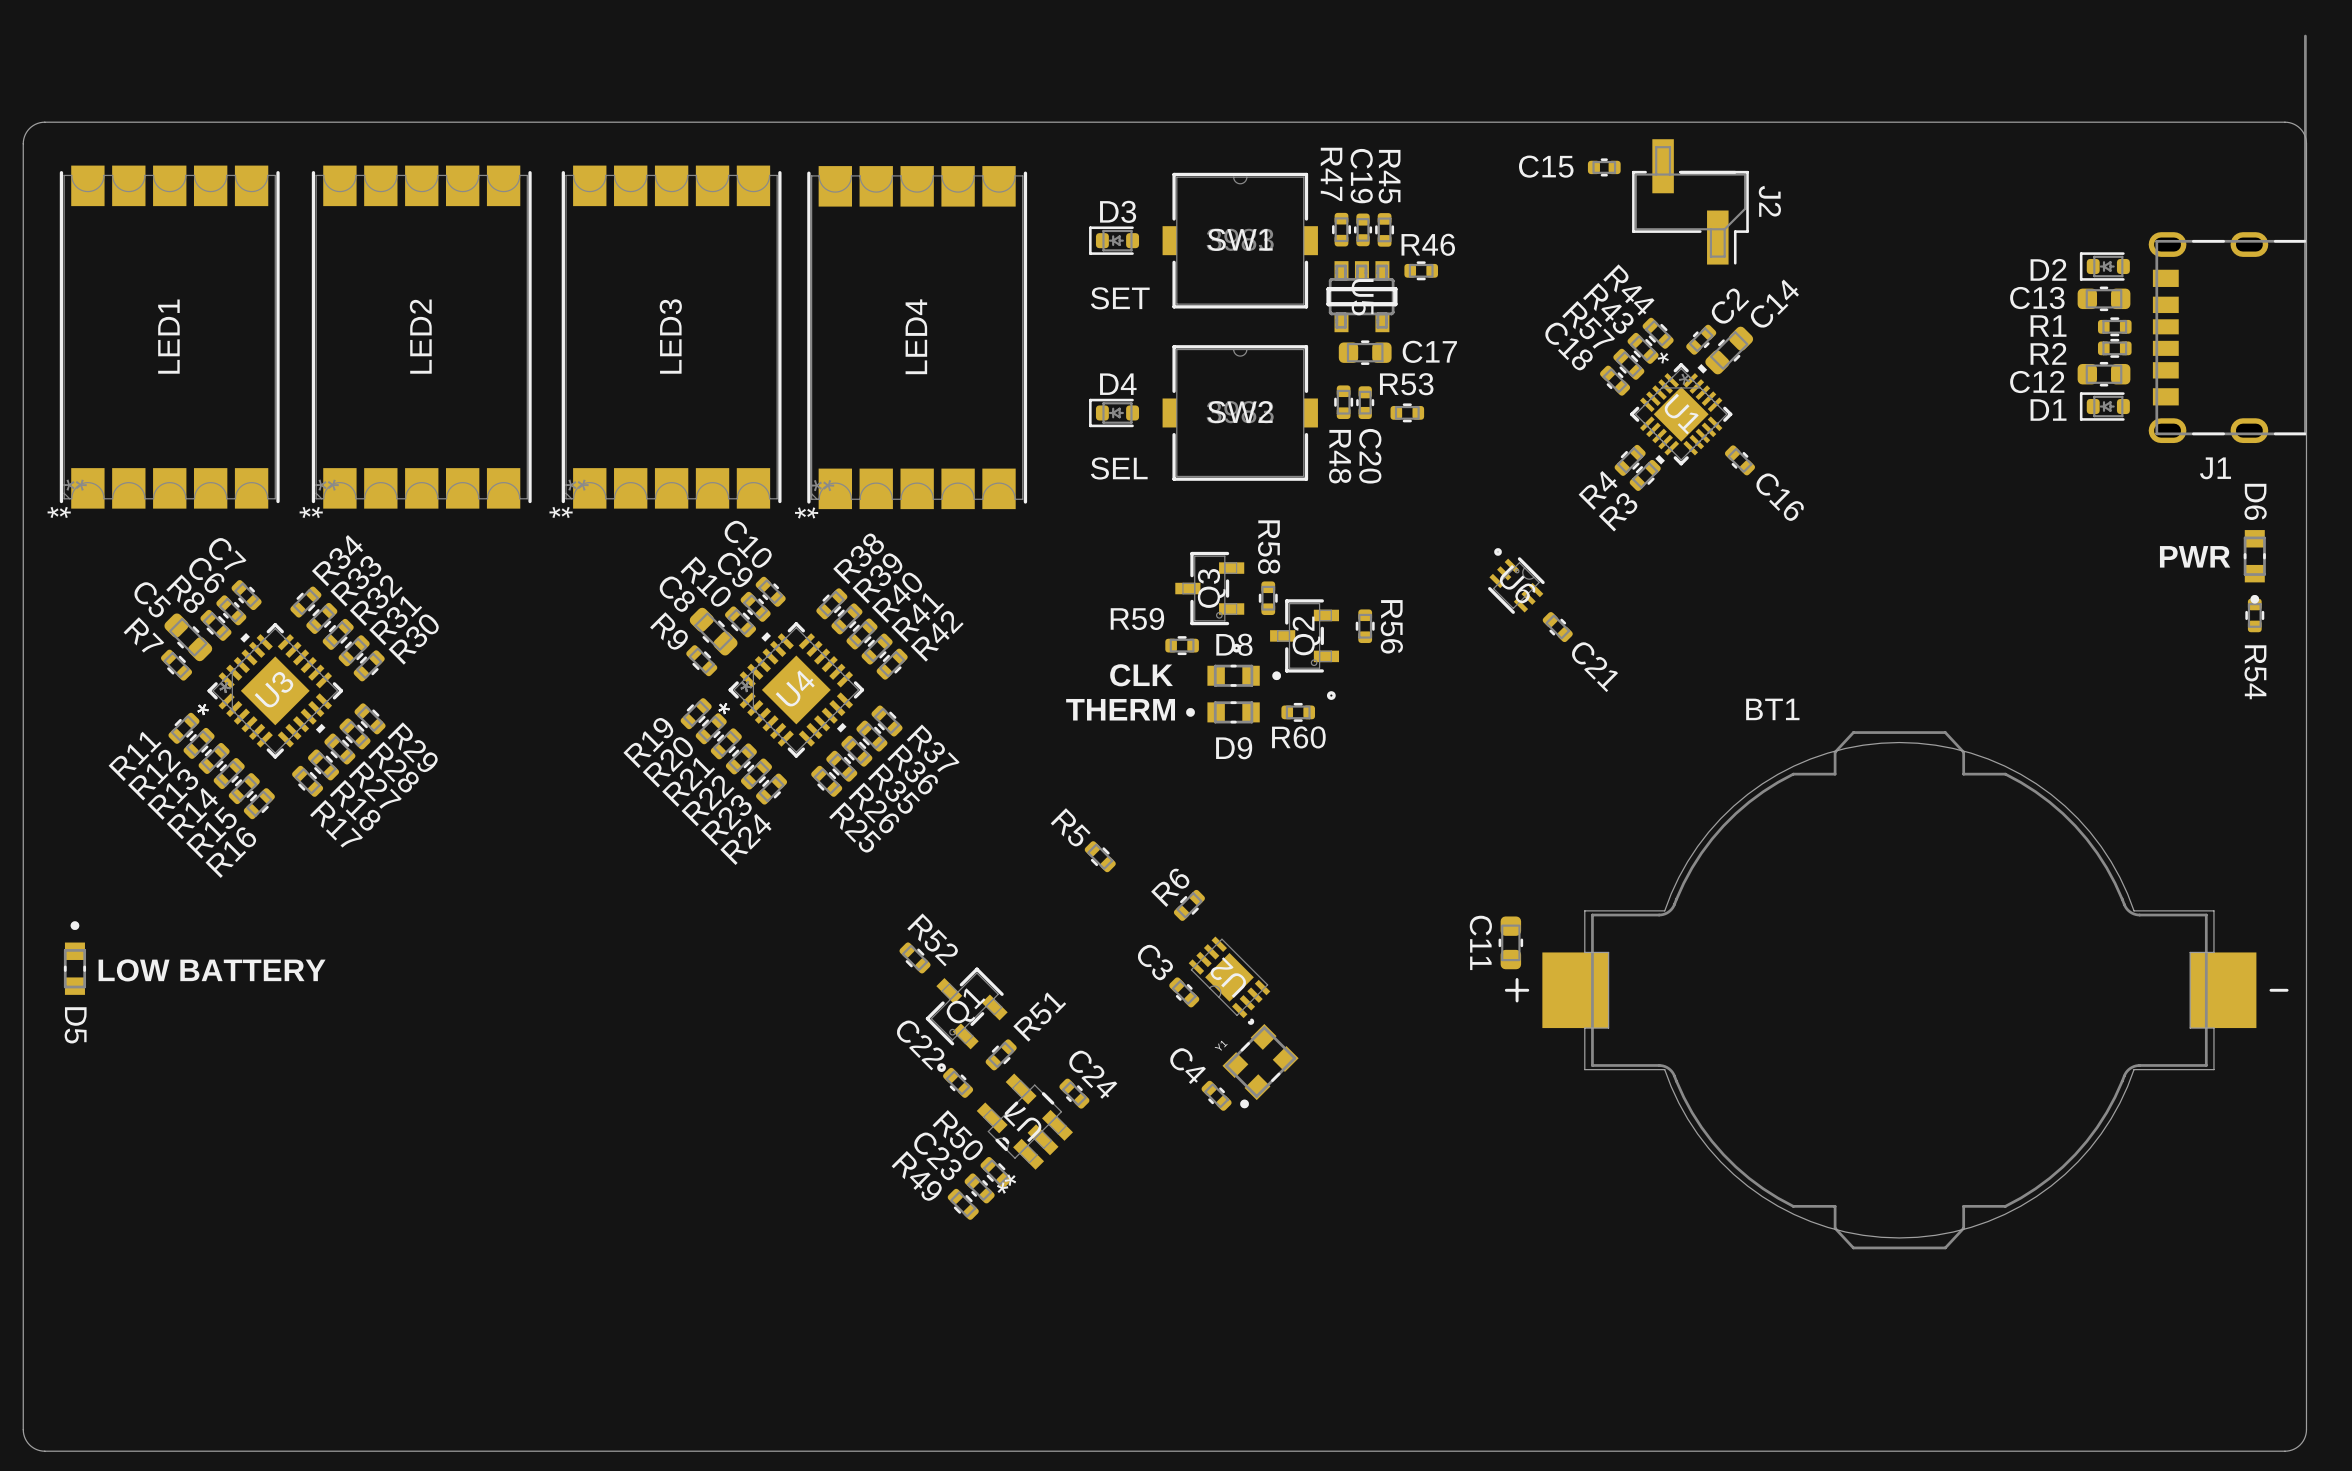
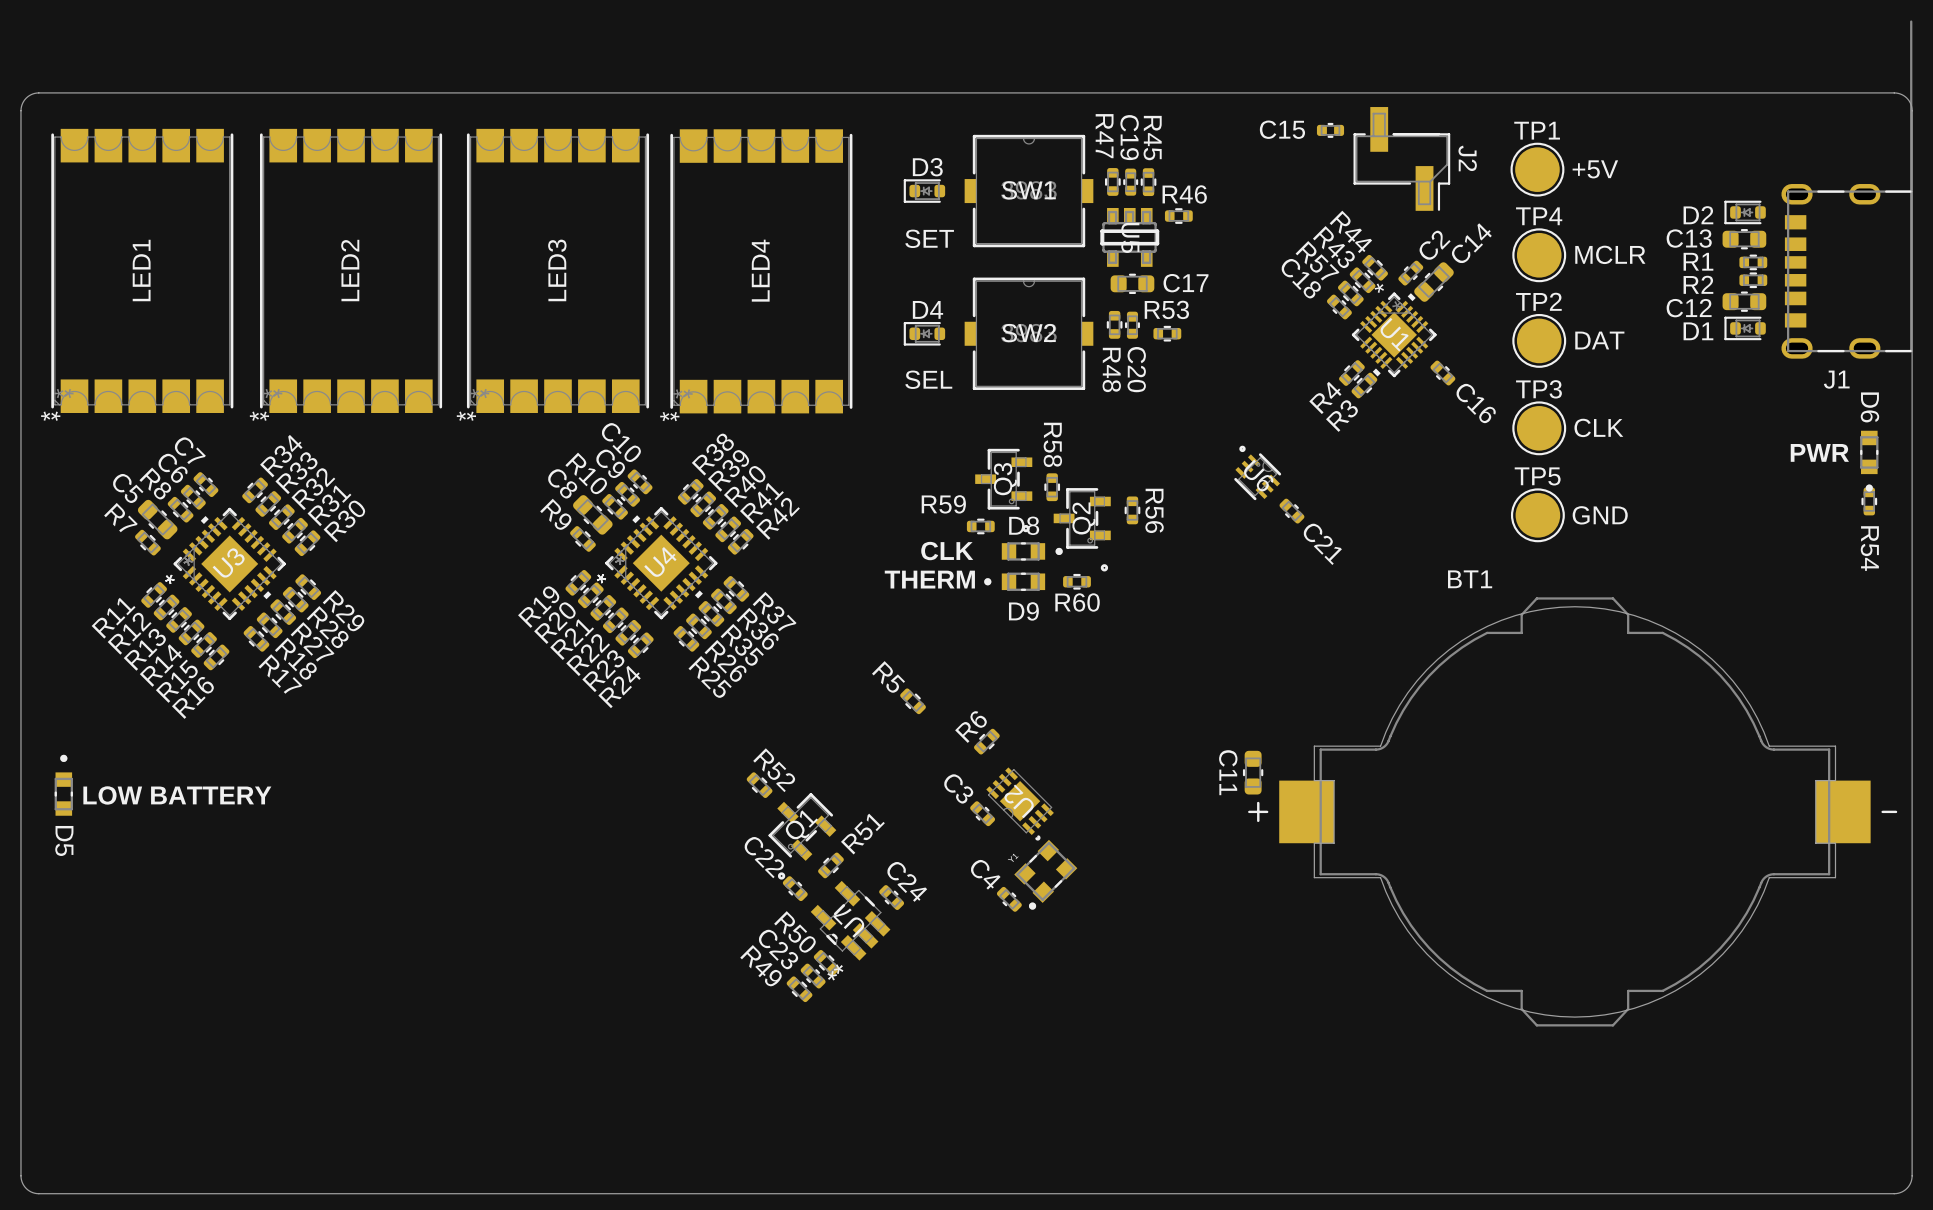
TP1: none -> (1537, 169)
text: none -> +5V (1595, 169)
text: none -> MCLR (1610, 254)
TP4: none -> (1539, 255)
TP2: none -> (1539, 340)
text: none -> DAT (1599, 340)
text: none -> CLK (1598, 427)
TP3: none -> (1539, 428)
TP5: none -> (1537, 515)
text: none -> GND (1600, 515)

